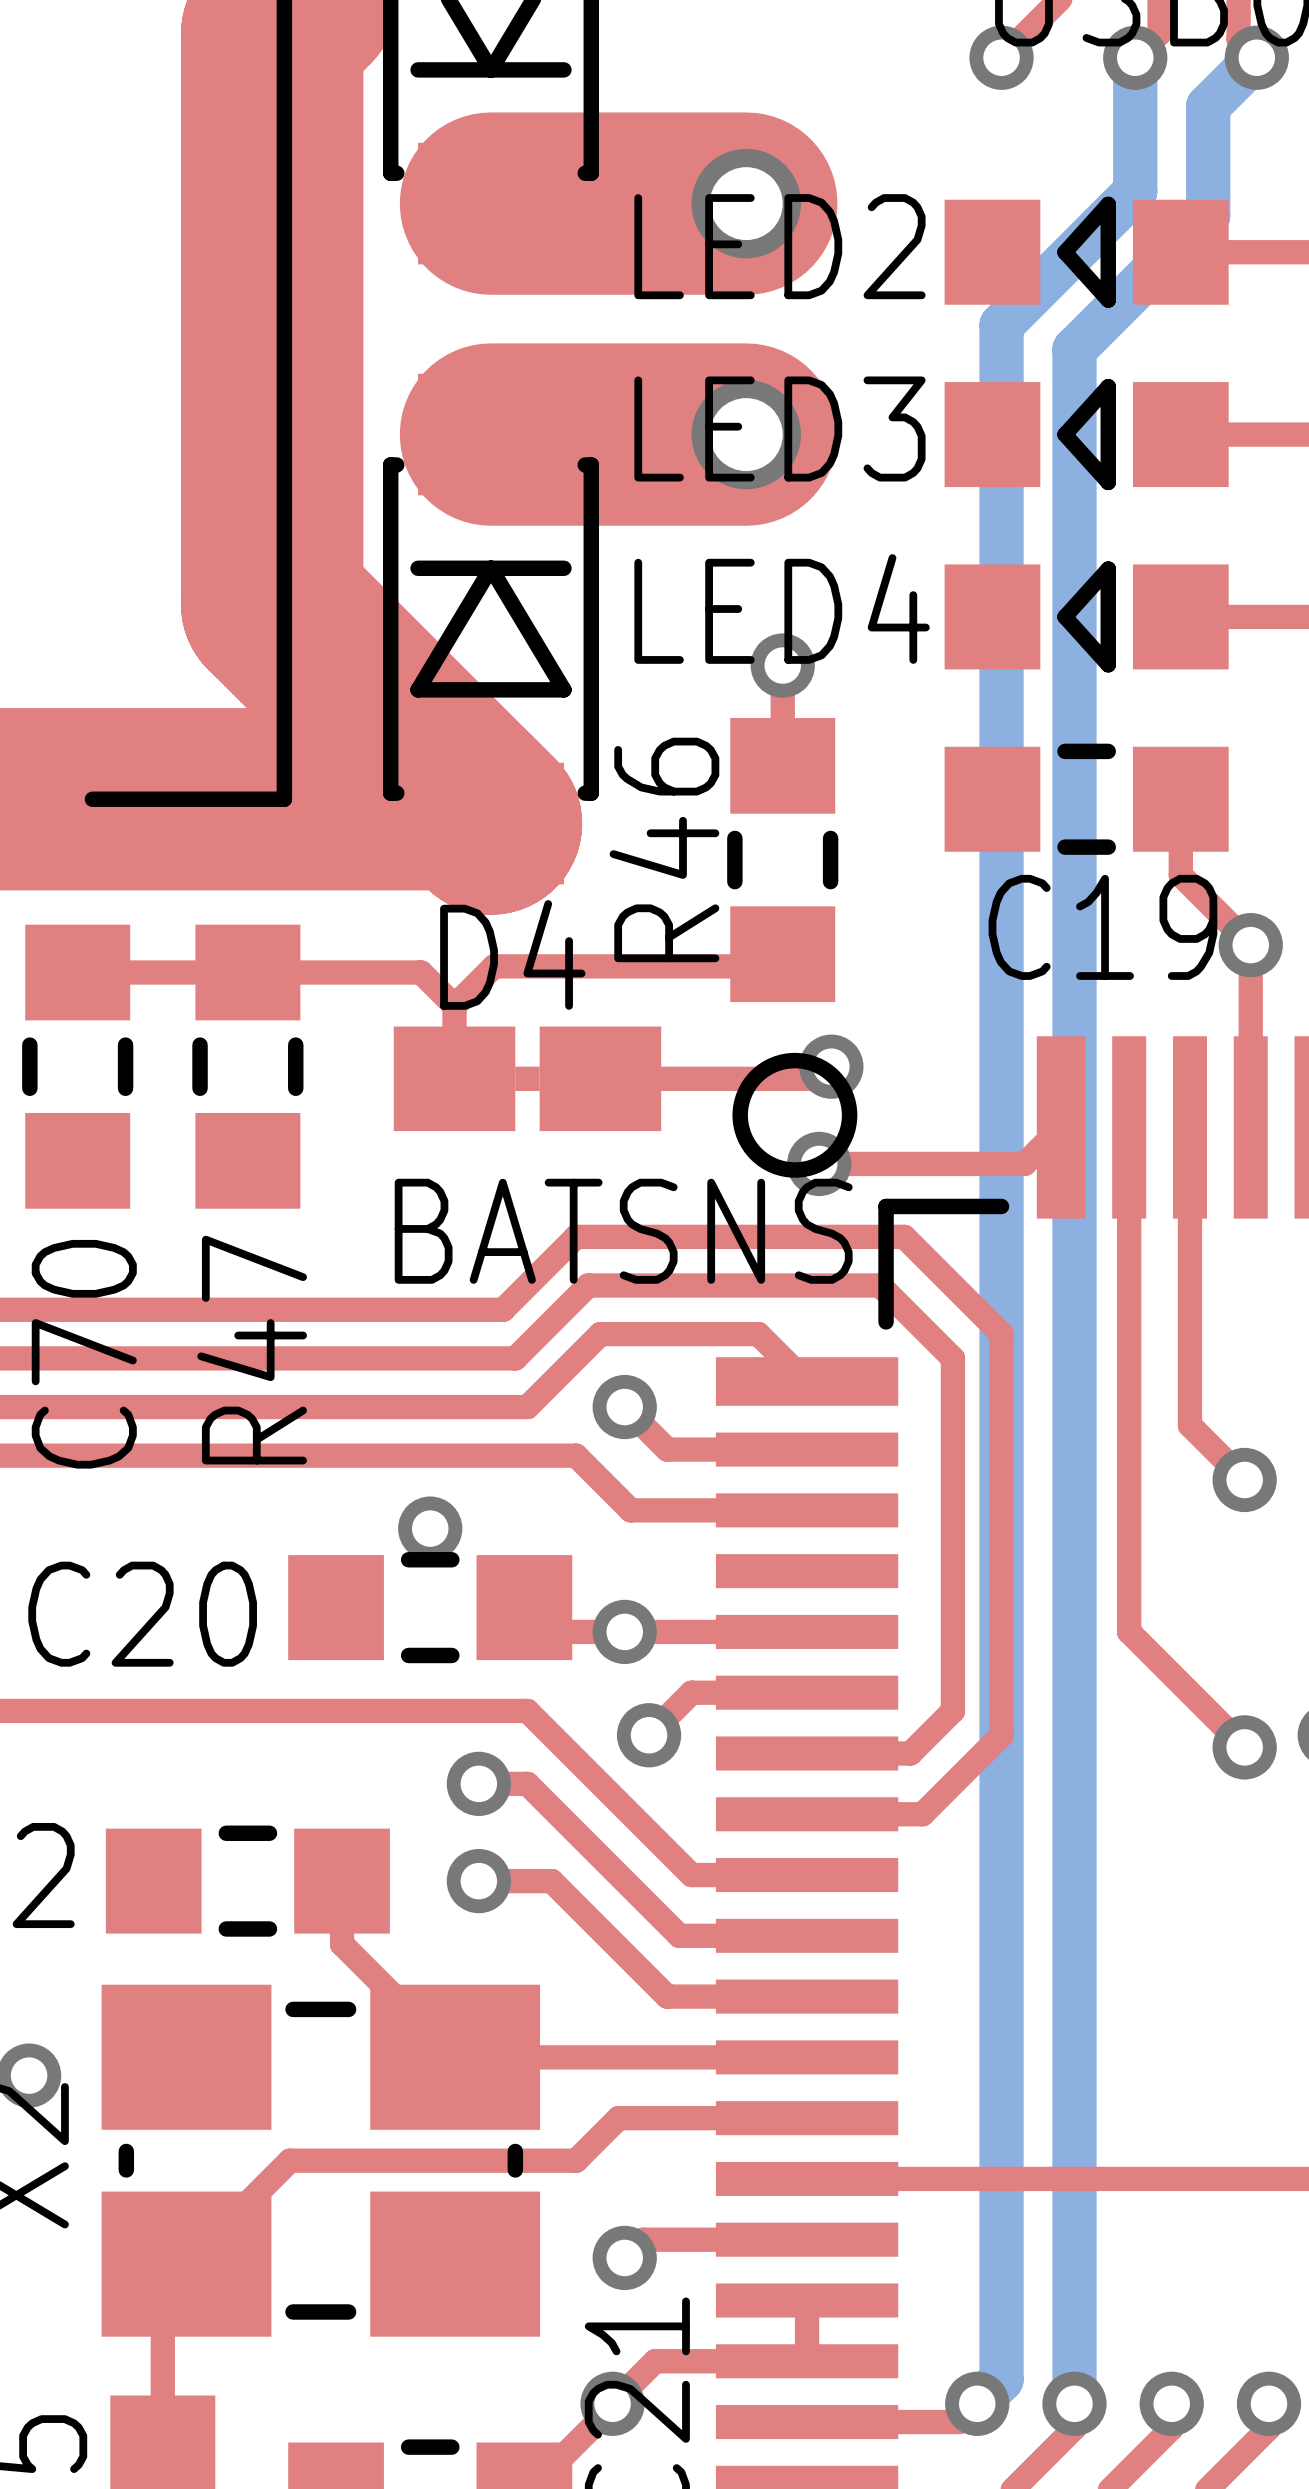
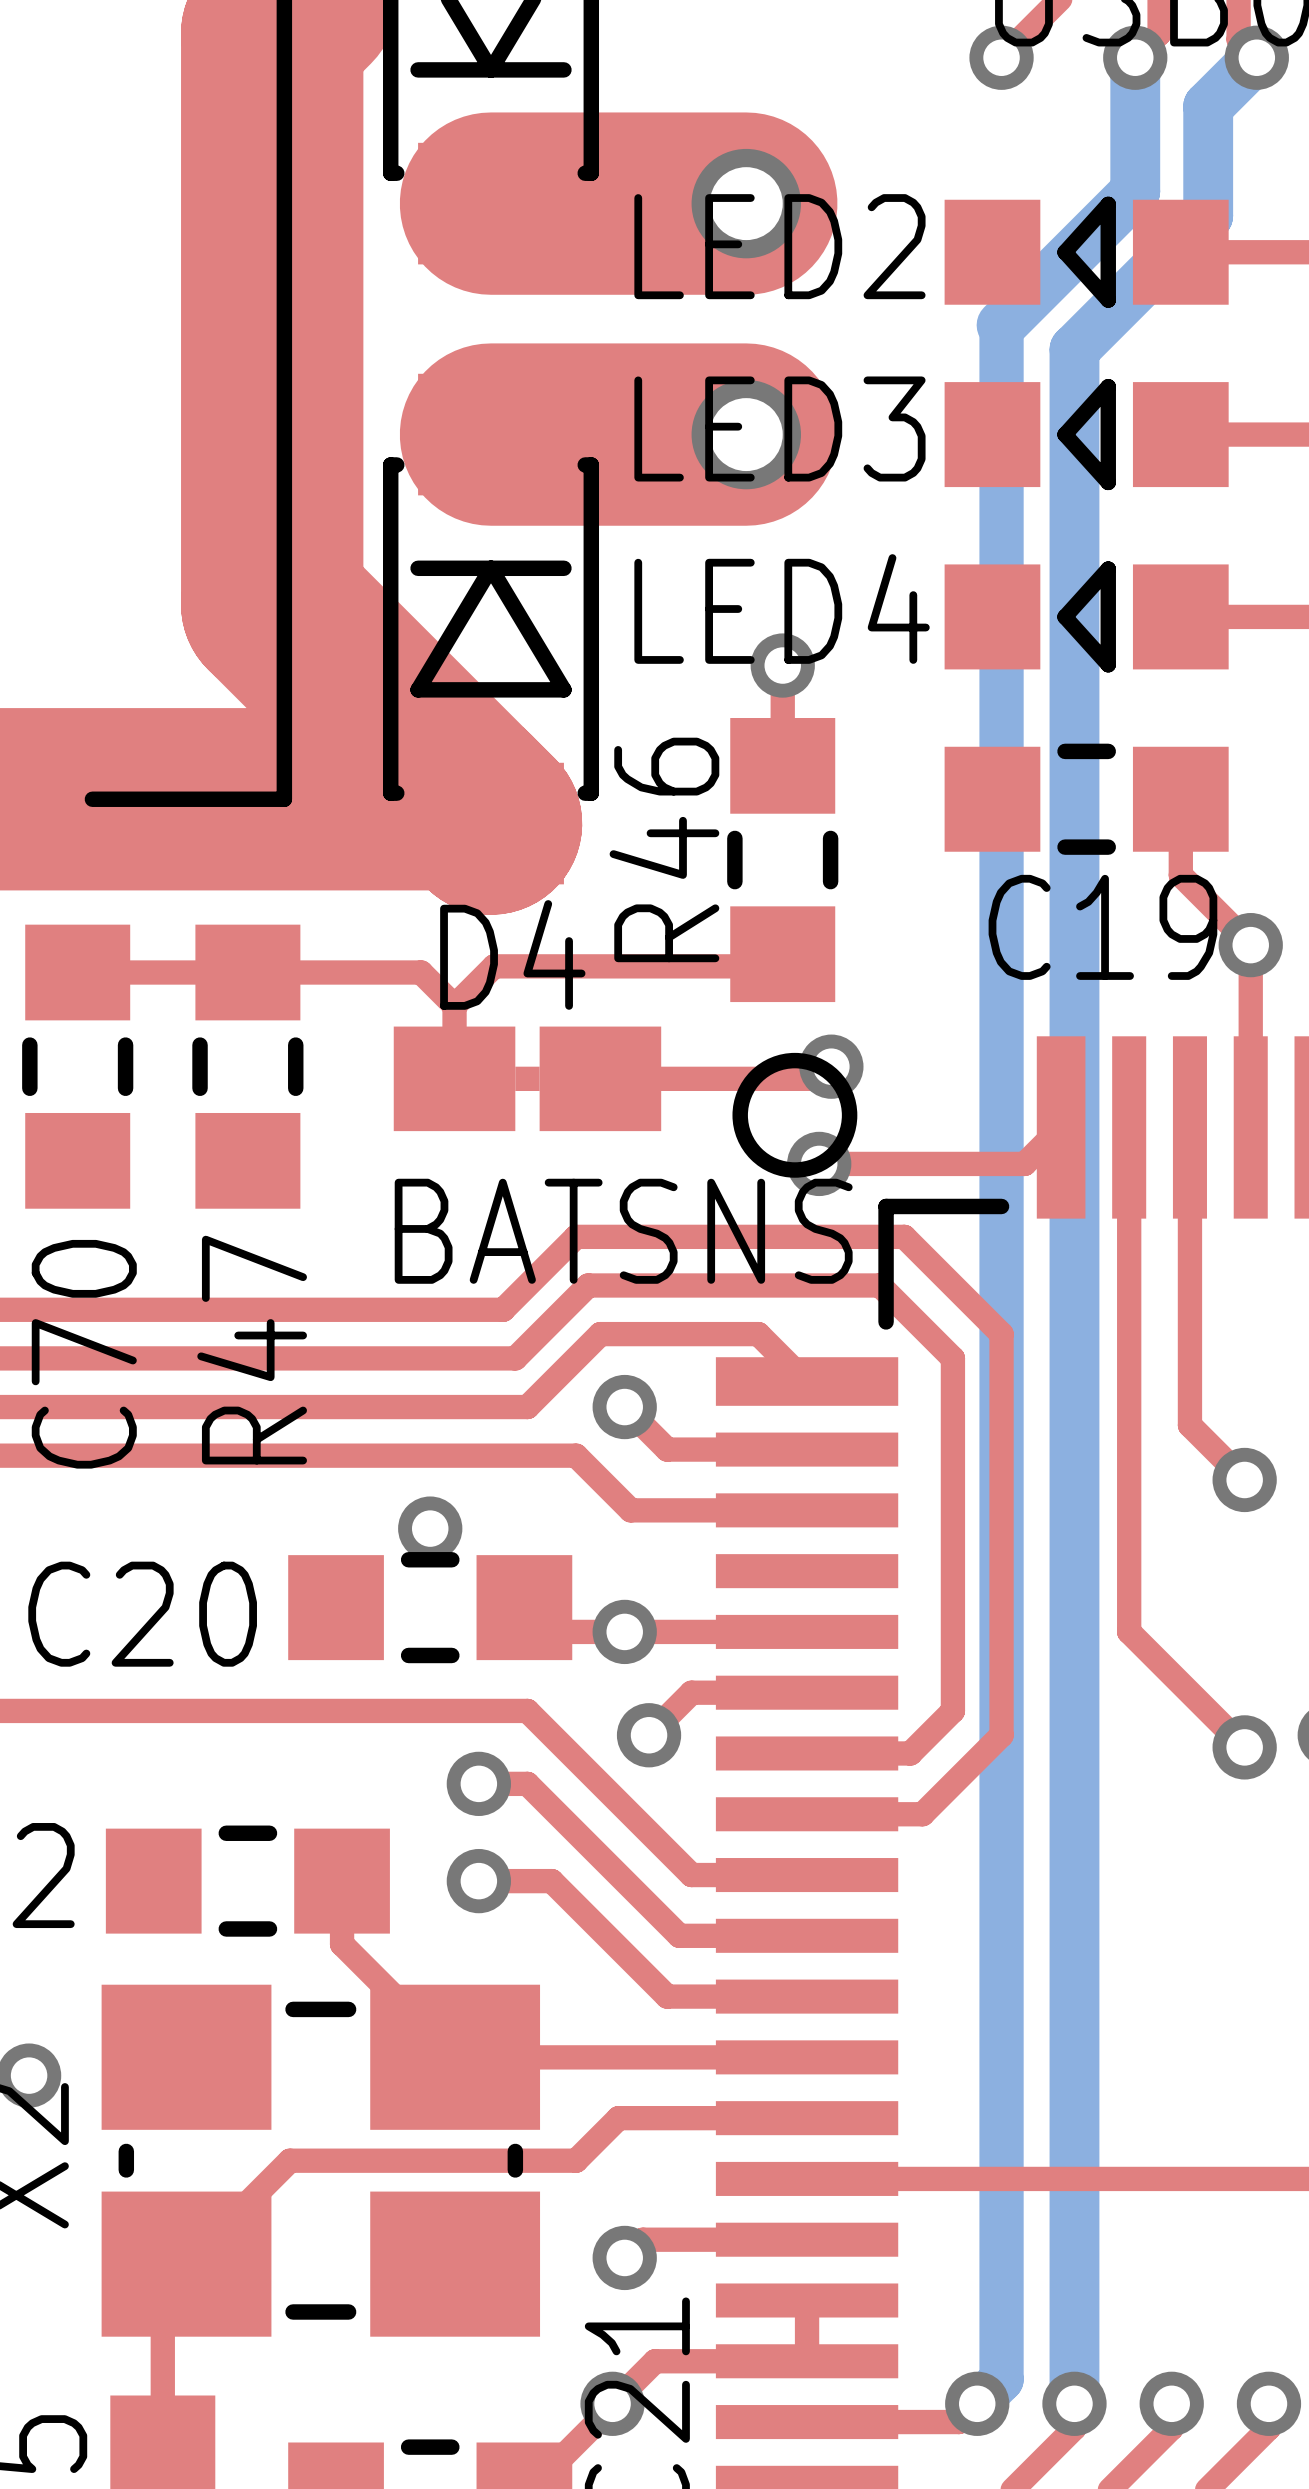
bottom track width: thin (1135, 57) (1135, 191) (1001, 325) -> thick (1135, 57) (1135, 191) (1001, 325)
bottom track width: thin (1256, 57) (1208, 106) (1208, 215) (1074, 349) (1074, 2403) -> thick (1256, 57) (1208, 106) (1208, 215) (1074, 349) (1074, 2403)

